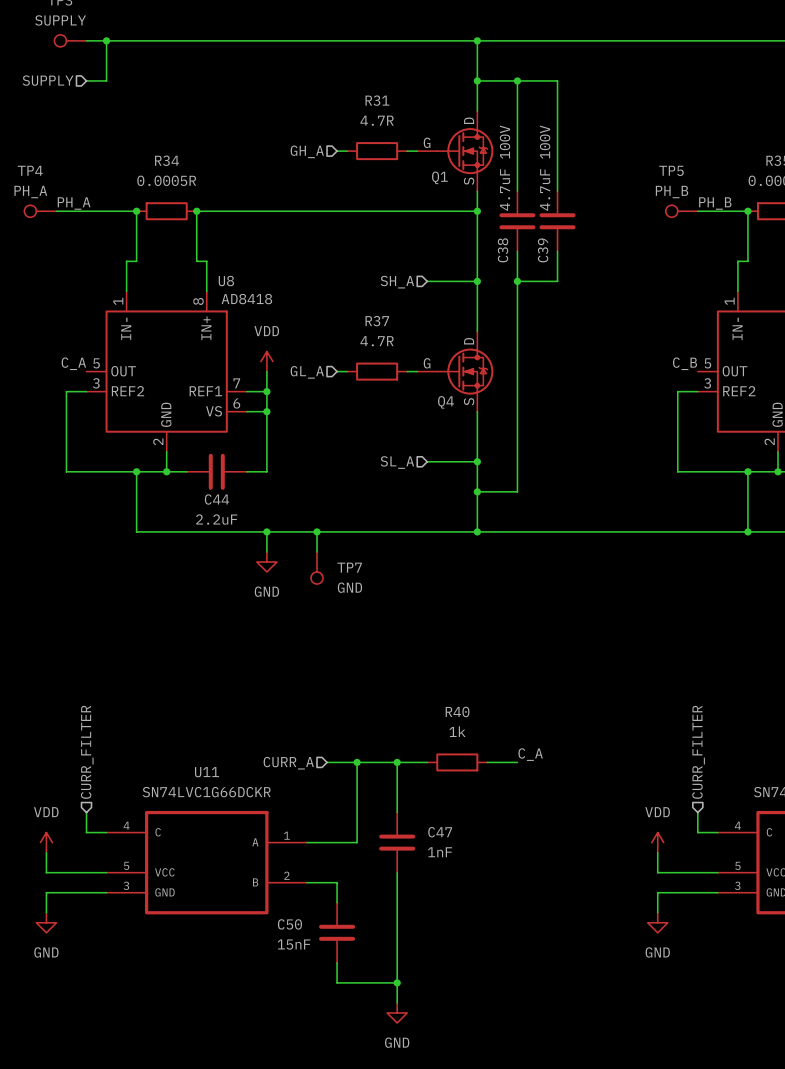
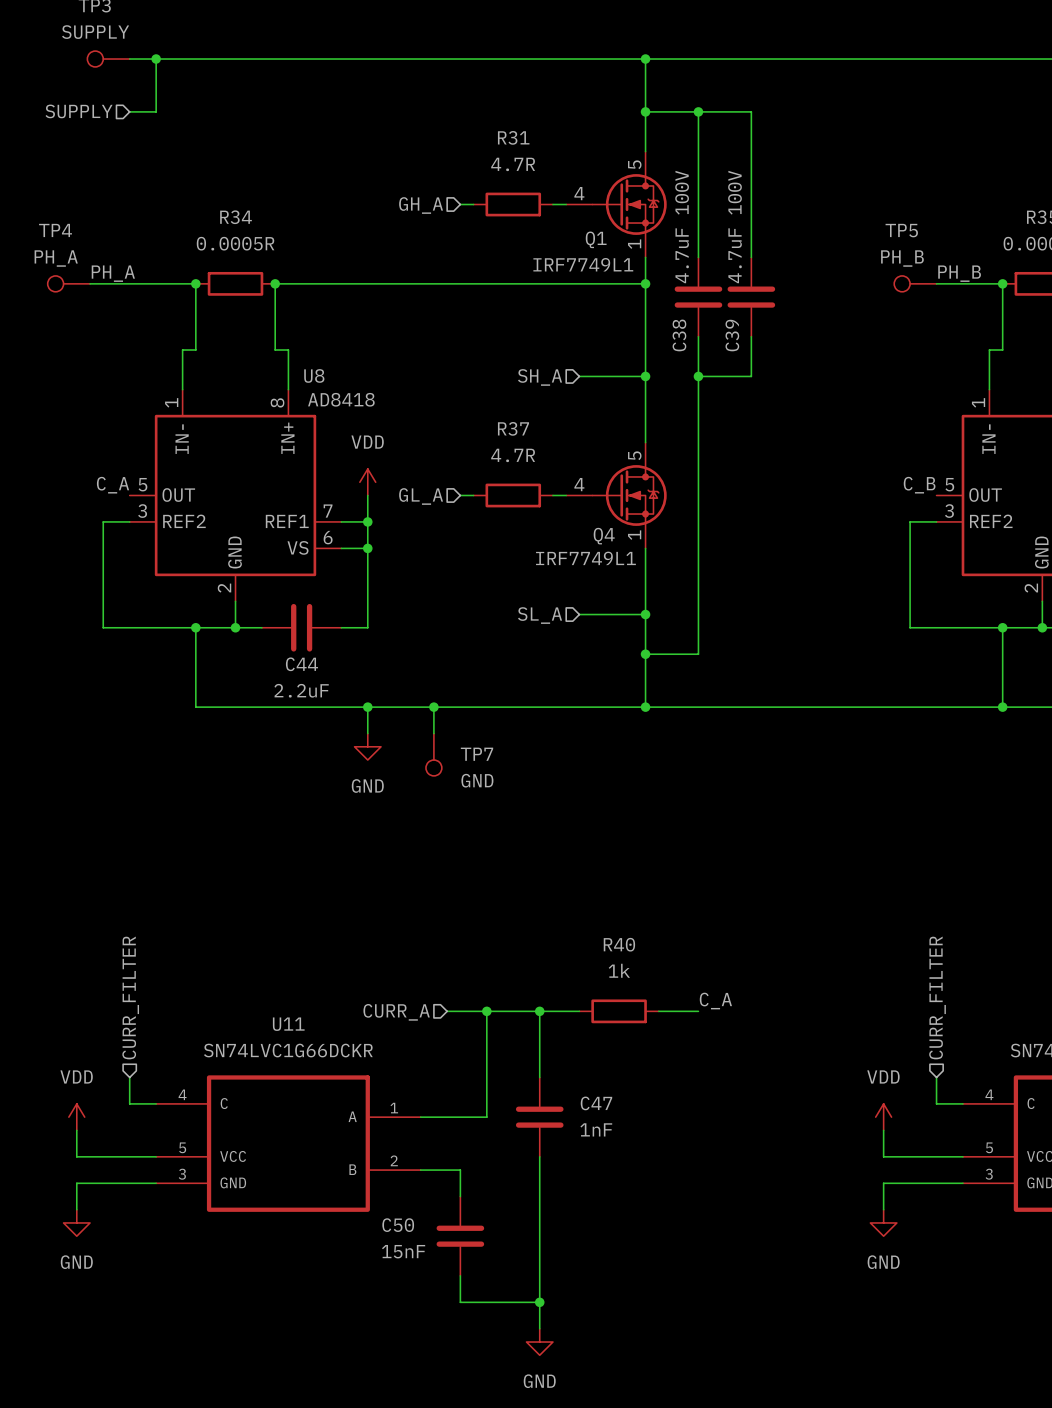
Q1 pin number: D (469, 120) -> 5 (634, 164)
Q1 pin number: G (427, 142) -> 4 (579, 193)
Q1 pin number: S (469, 181) -> 1 (634, 244)
Q1 value: none -> IRF7749L1 (583, 264)
Q4 pin number: D (469, 341) -> 5 (634, 455)
Q4 pin number: G (427, 363) -> 4 (579, 484)
Q4 pin number: S (469, 401) -> 1 (634, 535)
Q4 value: none -> IRF7749L1 (585, 558)

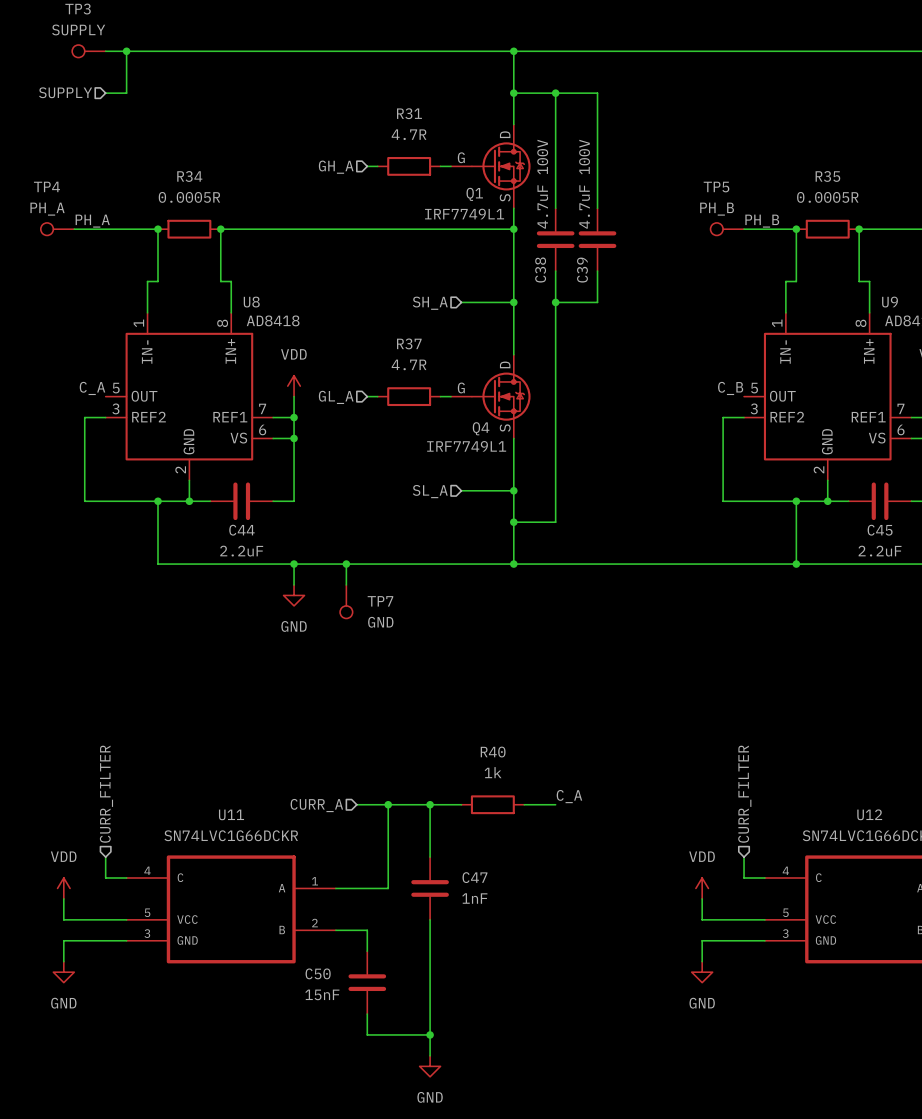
Q1 pin number: 5 (634, 164) -> D (505, 134)
Q1 pin number: 4 (579, 193) -> G (461, 157)
Q1 pin number: 1 (634, 244) -> S (505, 197)
Q4 pin number: 5 (634, 455) -> D (505, 364)
Q4 pin number: 4 (579, 484) -> G (461, 387)
Q4 pin number: 1 (634, 535) -> S (505, 428)

